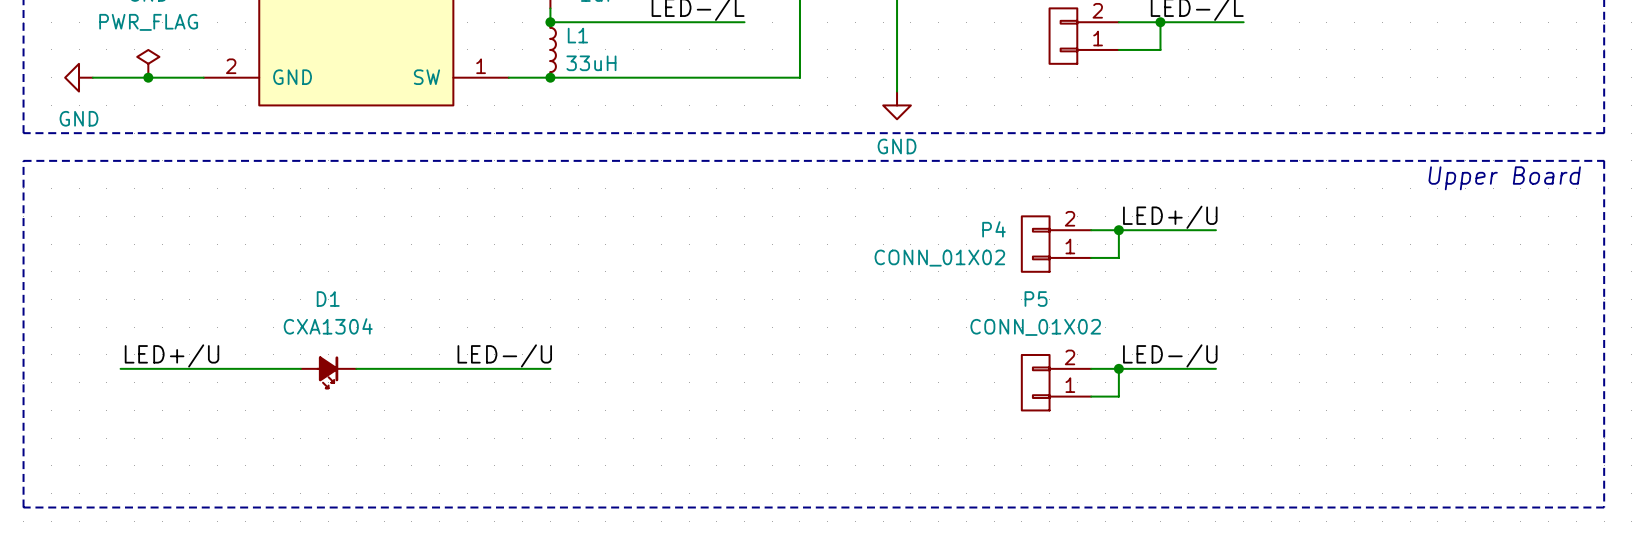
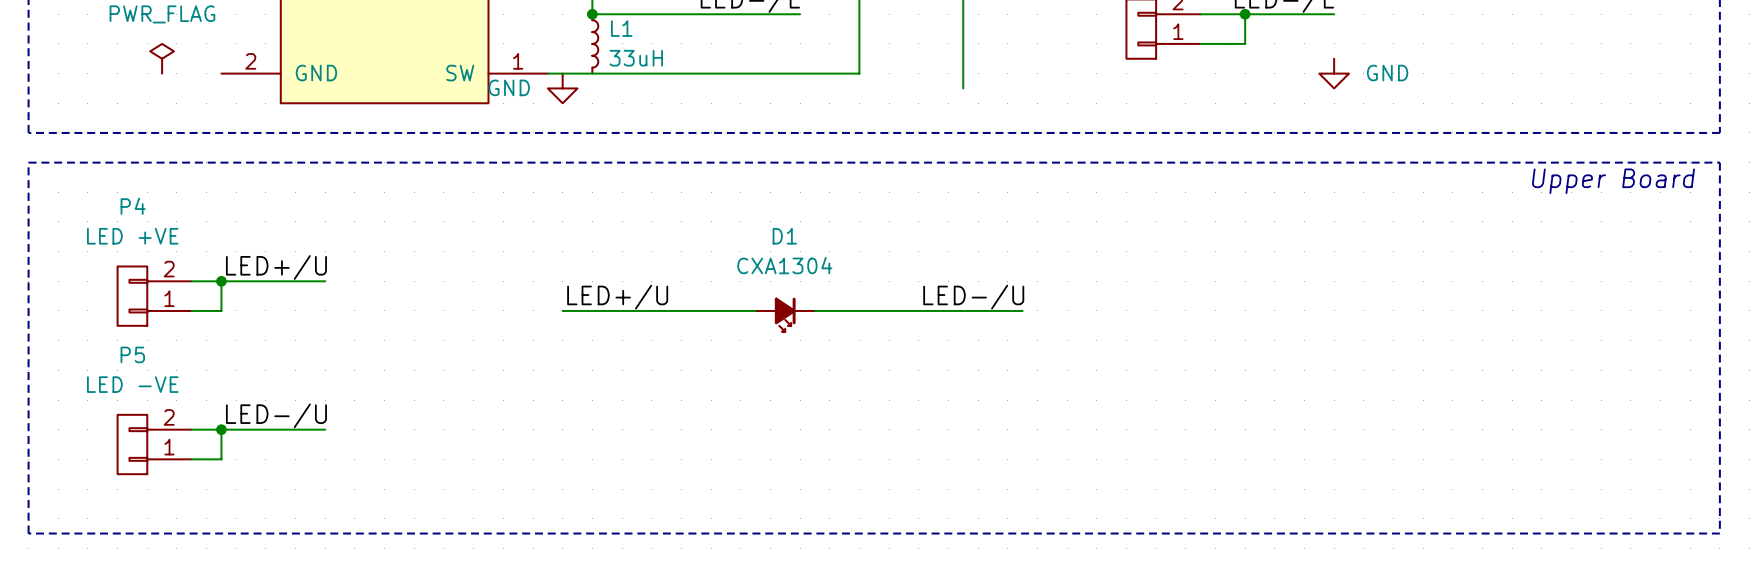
power symbol: GND (79, 77) -> none
wire: (92, 77) (203, 77) -> none
junction: (148, 77) -> none
junction: (550, 77) -> none
power symbol: none -> GND (1334, 73)
power symbol: none -> GND (562, 88)
power symbol: GND (897, 105) -> none
label: LED+/U (1170, 217) -> none
P4 name position: P4 (993, 229) -> P4 (133, 206)
wire: (1091, 230) (1215, 230) -> none
wire: (1118, 230) (1118, 257) (1091, 257) -> none
junction: (1118, 230) -> none
P4 position: (1056, 244) -> (154, 296)
P4 value: CONN_01X02 (939, 258) -> LED +VE (132, 236)
wire: none -> (191, 281) (325, 281)
wire: none -> (221, 281) (221, 310) (191, 310)
junction: none -> (221, 281)
label: none -> LED+/U (617, 297)
label: none -> LED-/U (973, 297)
wire: none -> (562, 310) (755, 310)
wire: none -> (814, 310) (1022, 310)
P5 value: CONN_01X02 (1035, 327) -> LED -VE (132, 384)
label position: LED+/U (172, 355) -> LED+/U (276, 267)
label: LED-/U (504, 355) -> none
label: LED-/U (1170, 355) -> none
wire: (120, 368) (300, 368) -> none
wire: (356, 368) (550, 368) -> none
wire: (1091, 368) (1215, 368) -> none
wire: (1118, 368) (1118, 396) (1091, 396) -> none
junction: (1118, 368) -> none
D1 position: (328, 372) -> (785, 314)
P5 position: (1056, 382) -> (154, 444)
label: none -> LED-/U (276, 415)
wire: none -> (191, 429) (325, 429)
wire: none -> (221, 429) (221, 459) (191, 459)
junction: none -> (221, 429)

